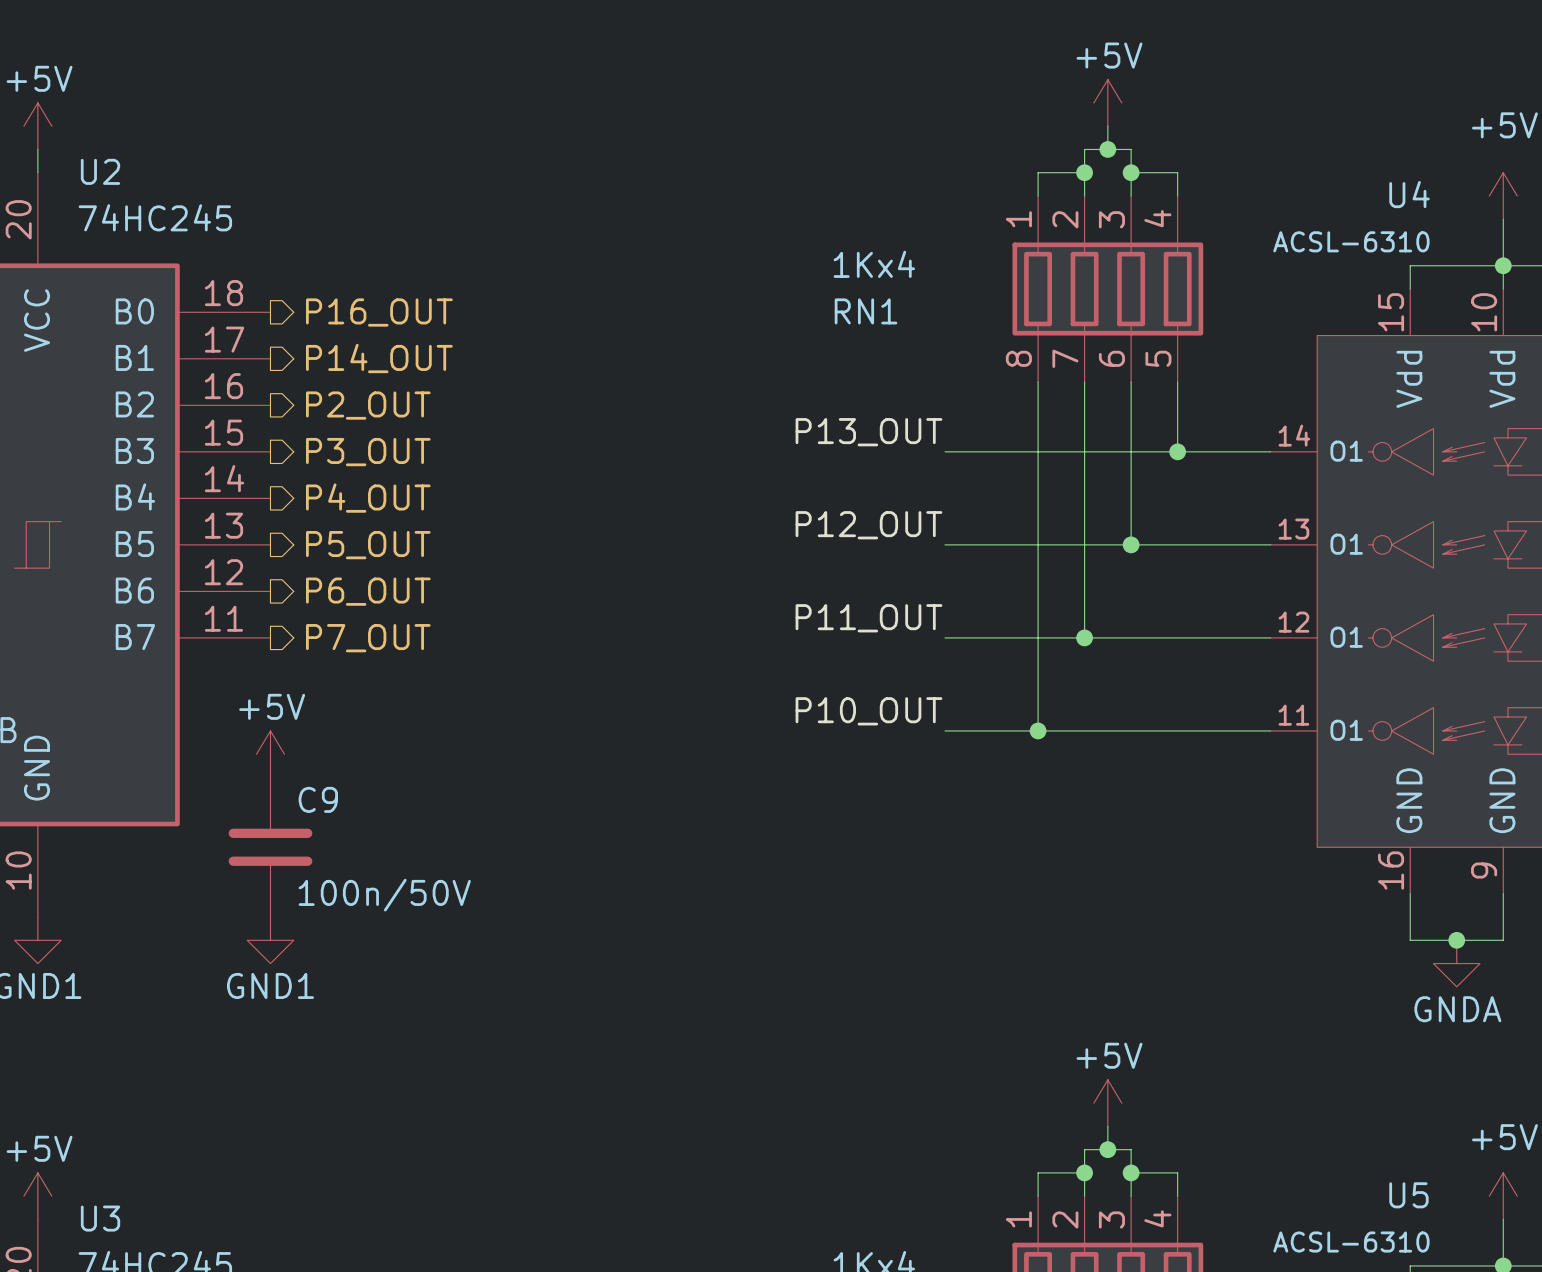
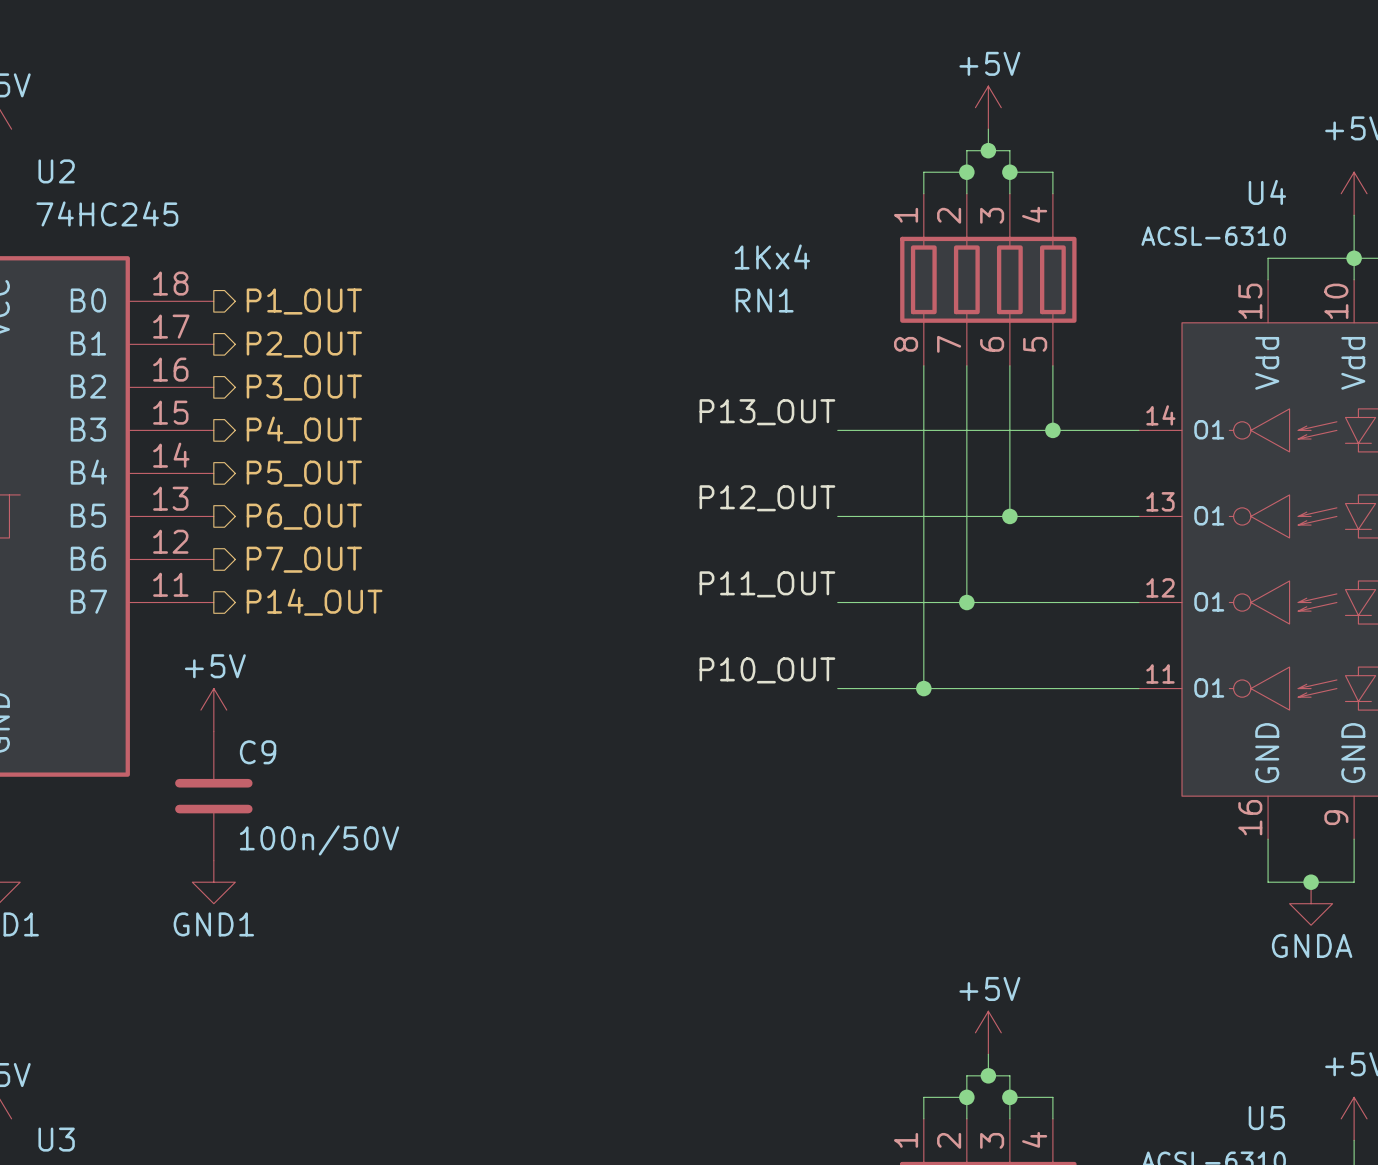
hierarchical label: P16_OUT (379, 312) -> P1_OUT (304, 301)
hierarchical label: P14_OUT (379, 358) -> P2_OUT (304, 344)
hierarchical label: P2_OUT (368, 405) -> P3_OUT (304, 387)
hierarchical label: P3_OUT (368, 452) -> P4_OUT (304, 430)
hierarchical label: P4_OUT (368, 498) -> P5_OUT (304, 473)
hierarchical label: P5_OUT (368, 545) -> P6_OUT (304, 516)
hierarchical label: P6_OUT (368, 591) -> P7_OUT (304, 559)
hierarchical label: P7_OUT (368, 638) -> P14_OUT (314, 602)

